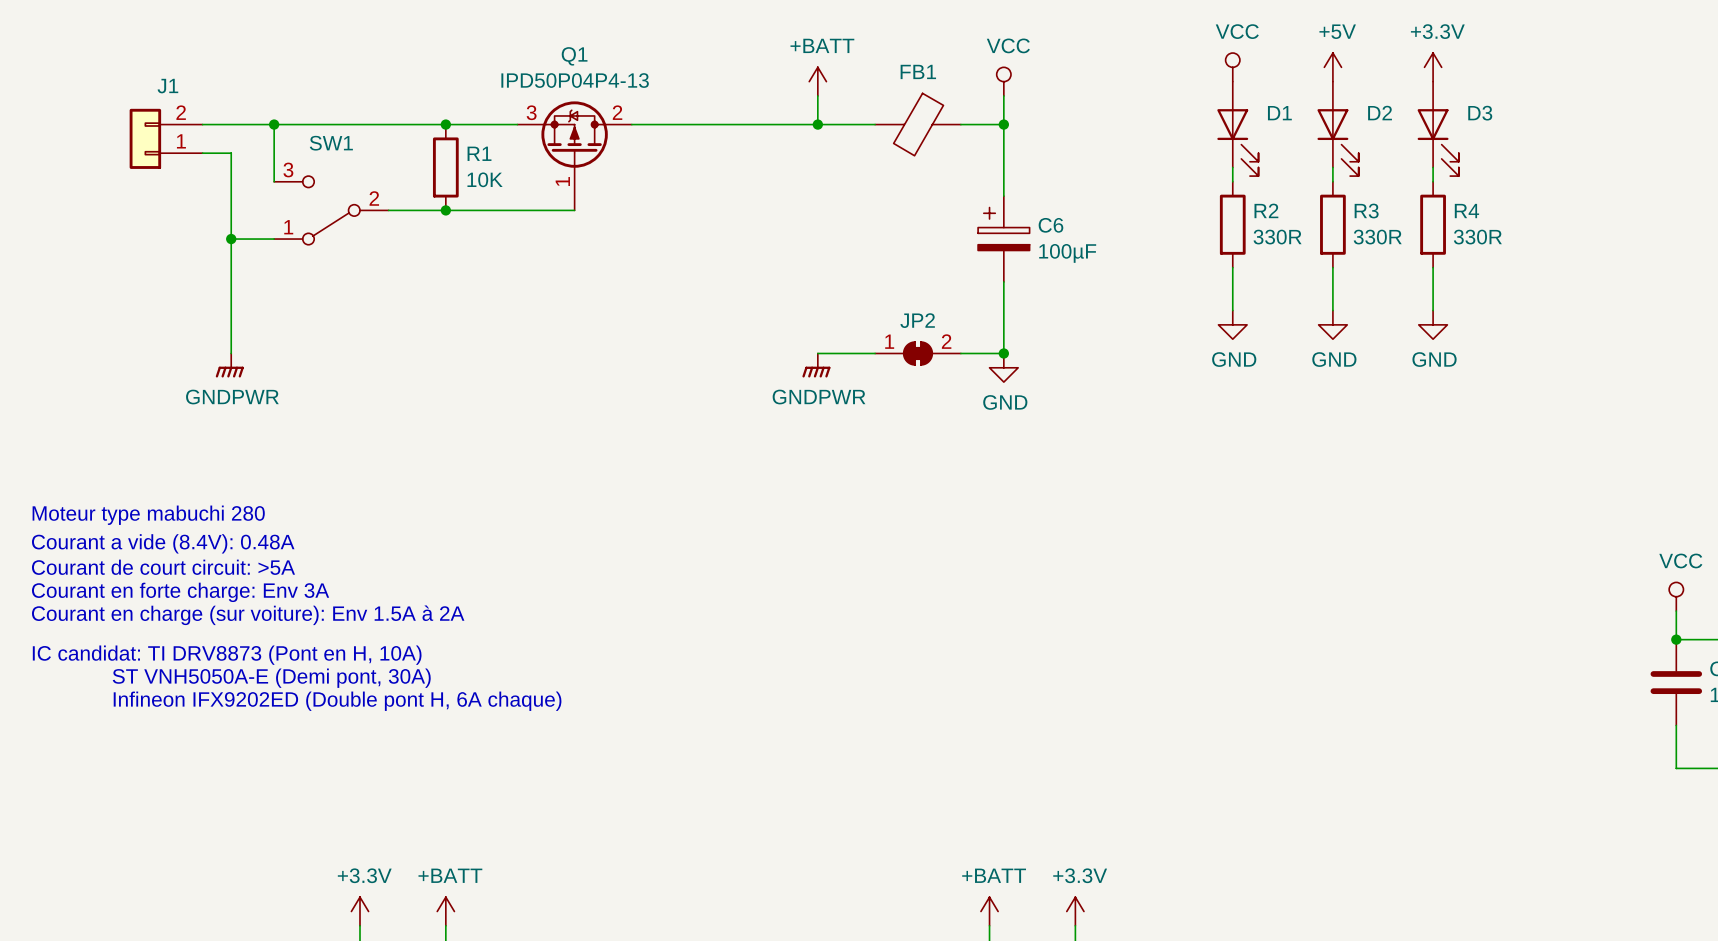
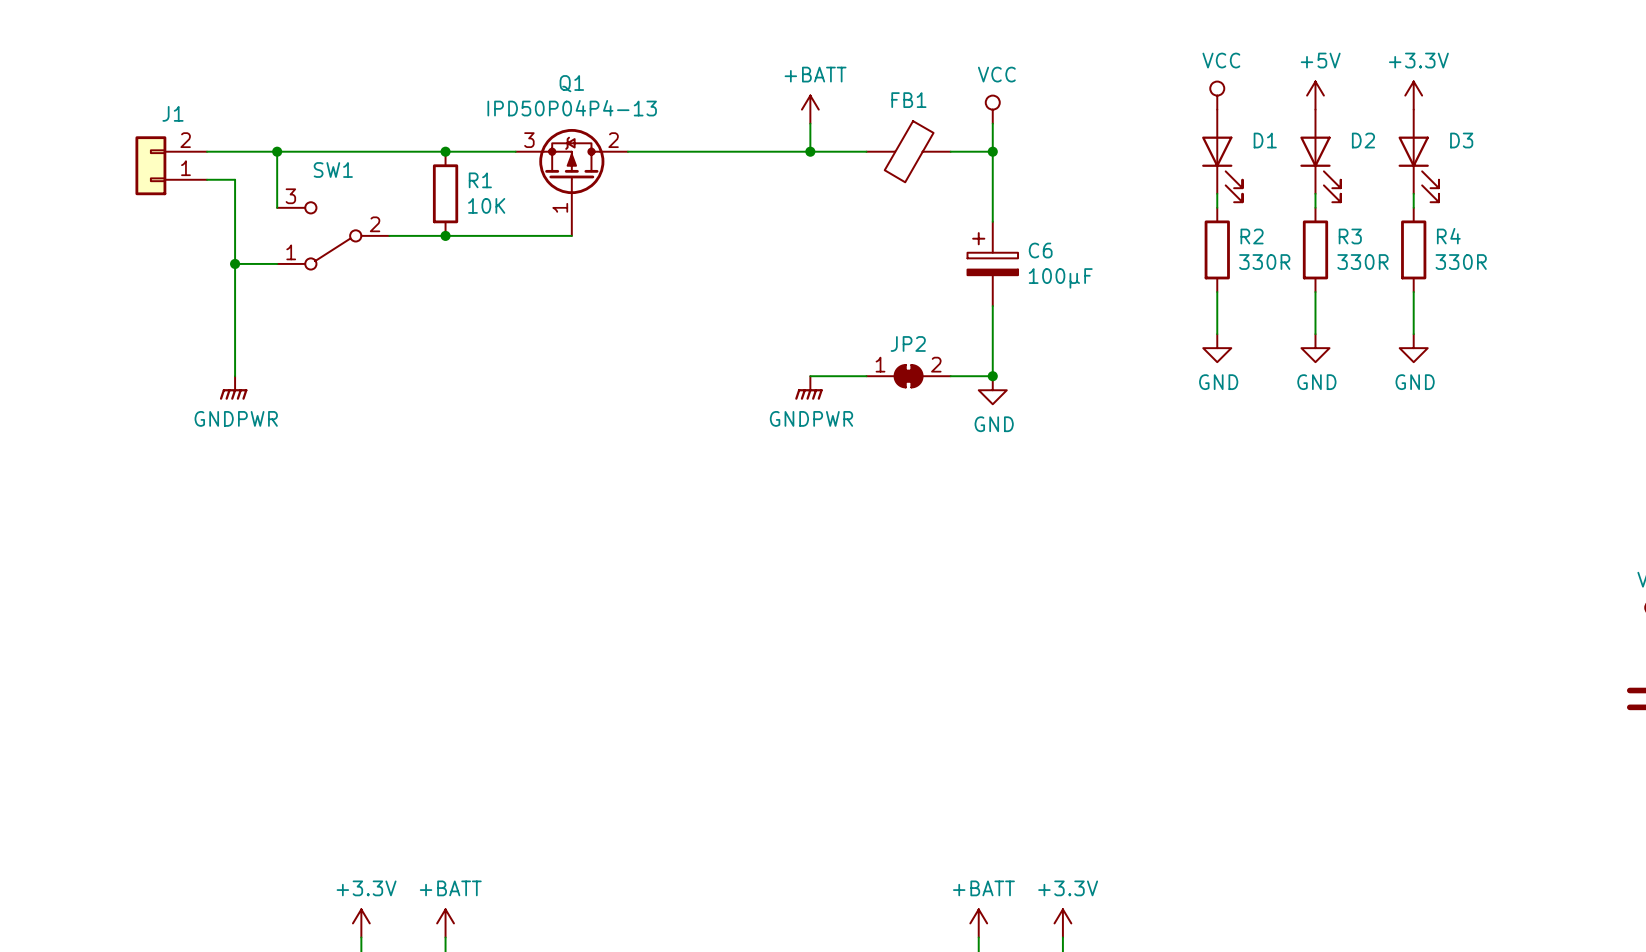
text: Moteur type mabuchi 280 (148, 515) -> none
text: Courant a vide (8.4V): 0.48A (163, 543) -> none
text: Courant de court circuit: >5A (163, 567) -> none
text: Courant en forte charge: Env 3A (180, 592) -> none
text: Courant en charge (sur voiture): Env 1.5A à 2A (248, 615) -> none
text: IC candidat: TI DRV8873 (Pont en H, 10A) (227, 655) -> none
text: ST VNH5050A-E (Demi pont, 30A) (271, 678) -> none
text: Infineon IFX9202ED (Double pont H, 6A chaque) (337, 701) -> none

